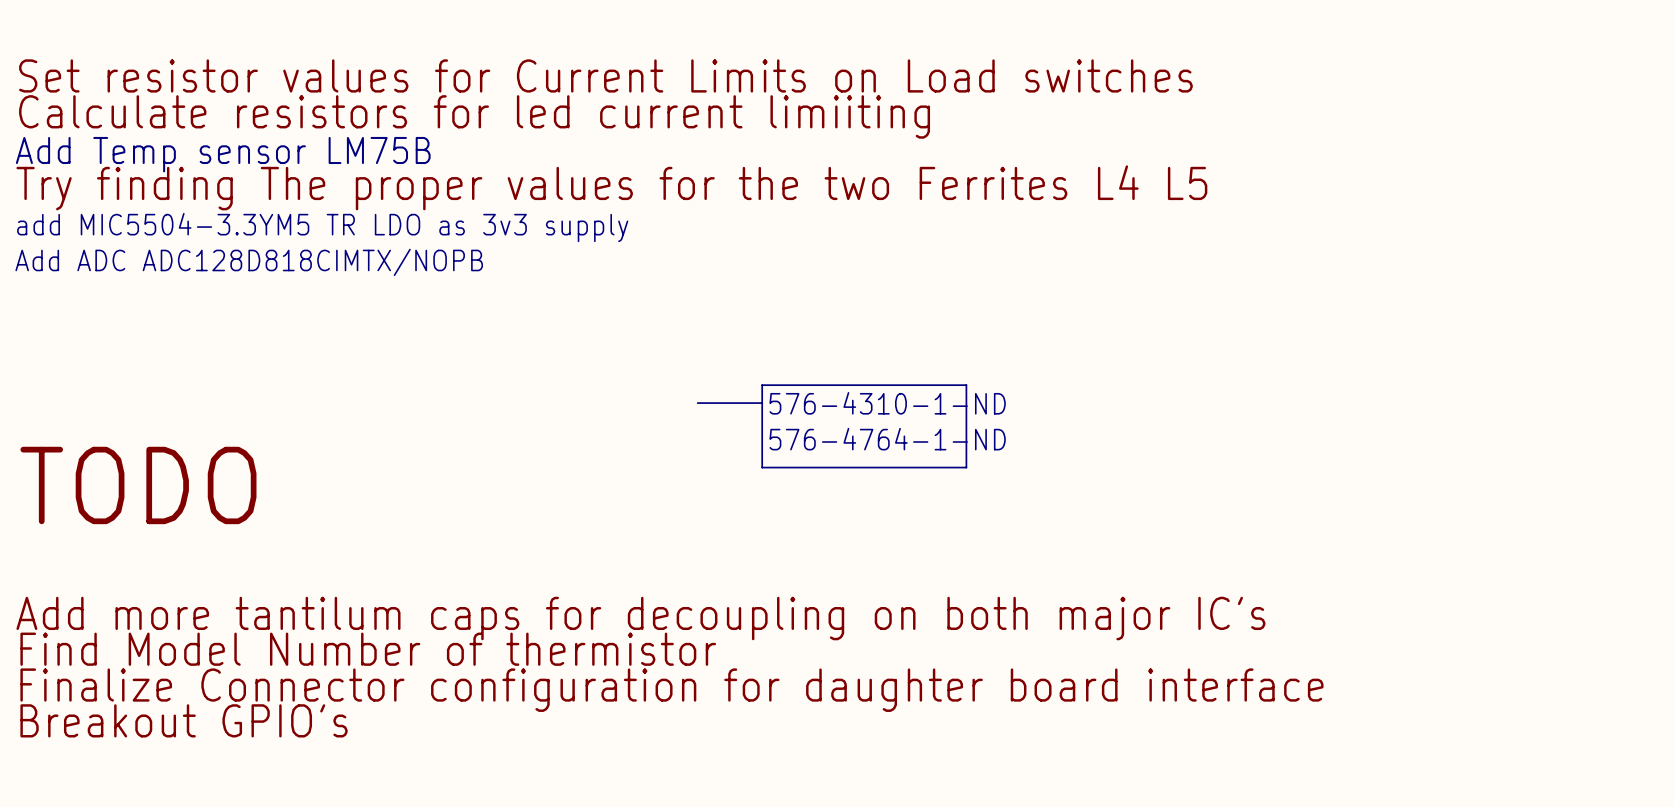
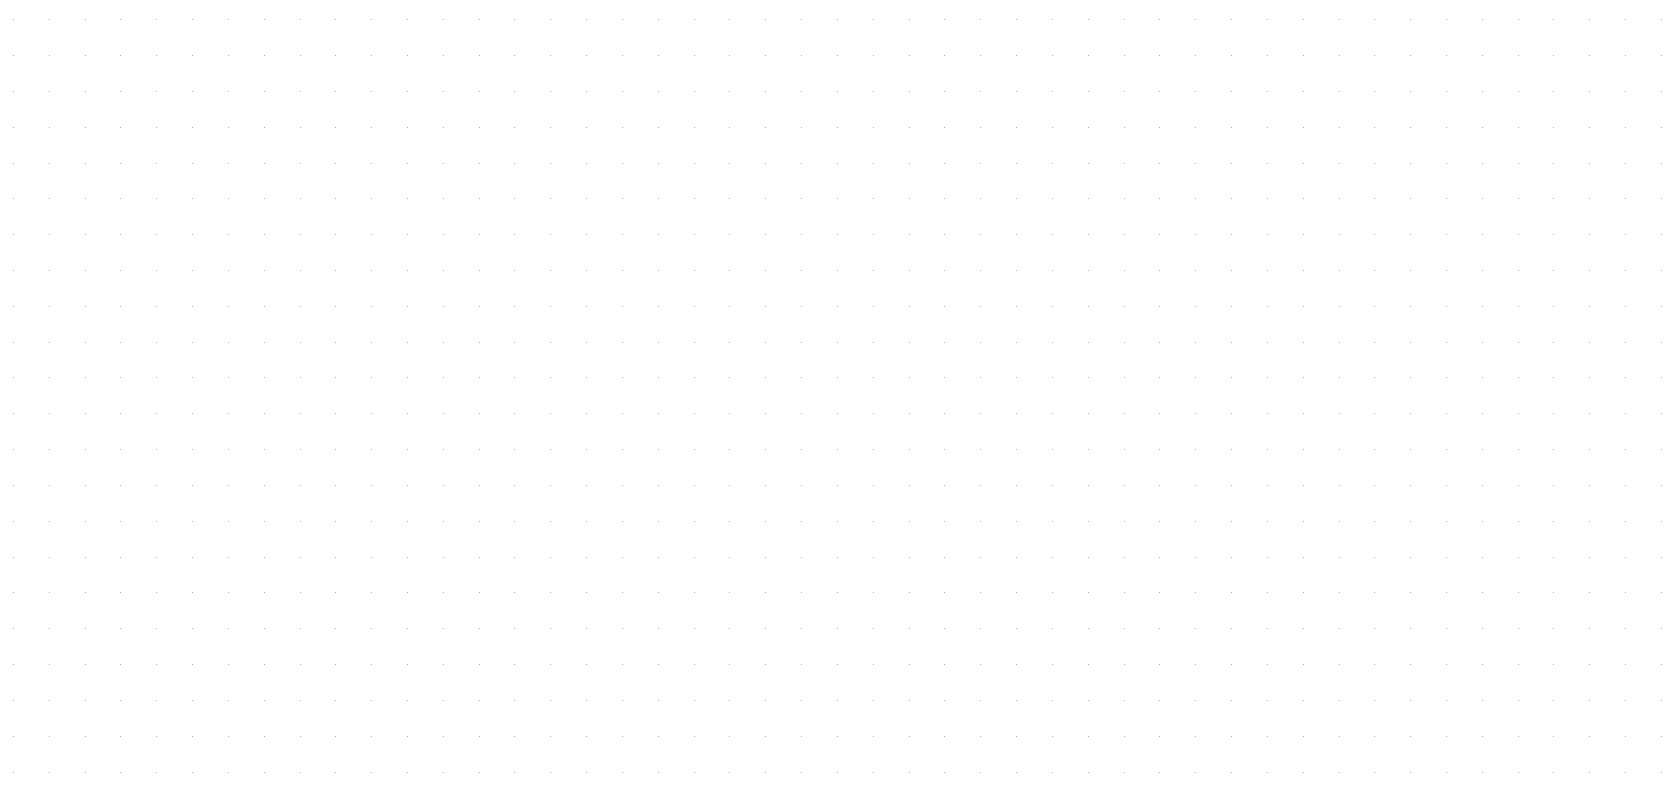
text: Set resistor values for Current Limits on Load switches (605, 75) -> none
text: Calculate resistors for led current limiiting (474, 116) -> none
text: Add Temp sensor LM75B (223, 154) -> none
text: Try finding The proper values for the two Ferrites L4 L5 (611, 187) -> none
text: add MIC5504-3.3YM5 TR LDO as 3v3 supply (322, 227) -> none
text: Add ADC ADC128D818CIMTX/NOPB (249, 262) -> none
wire: (762, 385) (762, 467) (966, 467) (966, 385) (762, 385) -> none
wire: (697, 403) (762, 403) -> none
text: 576-4310-1-ND (887, 403) -> none
text: 576-4764-1-ND (887, 439) -> none
text: TODO (138, 485) -> none
text: Add more tantilum caps for decoupling on both major IC's (640, 618) -> none
text: Find Model Number of thermistor (368, 649) -> none
text: Finalize Connector configuration for daughter board interface (671, 690) -> none
text: Breakout GPIO's (184, 720) -> none

